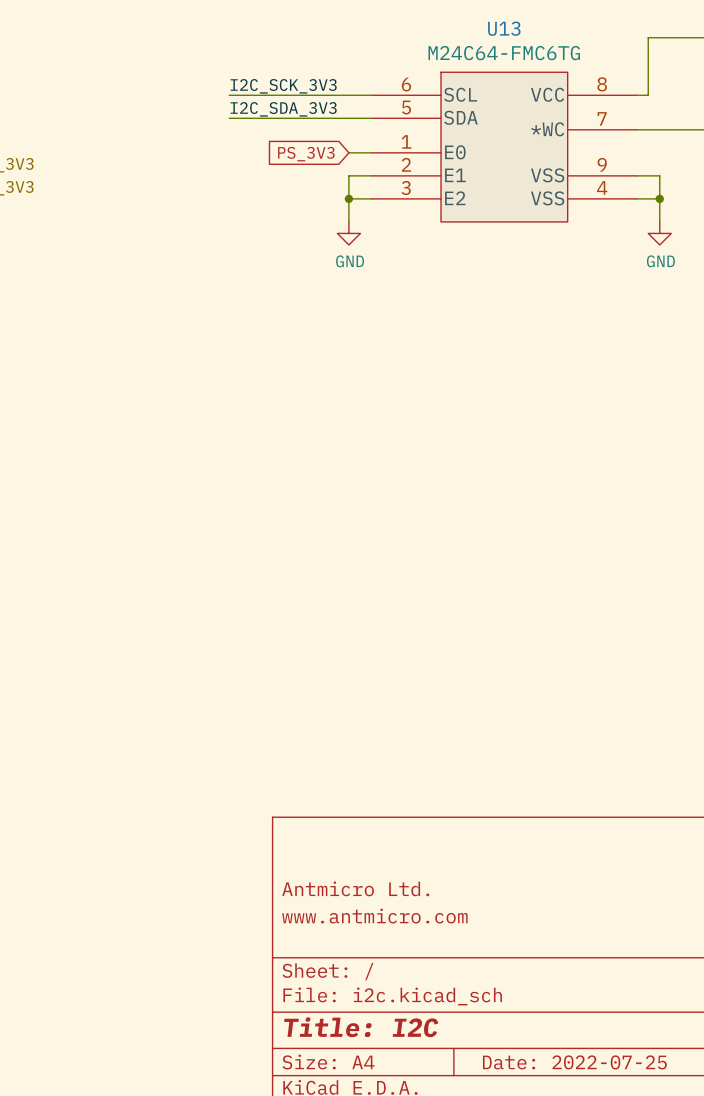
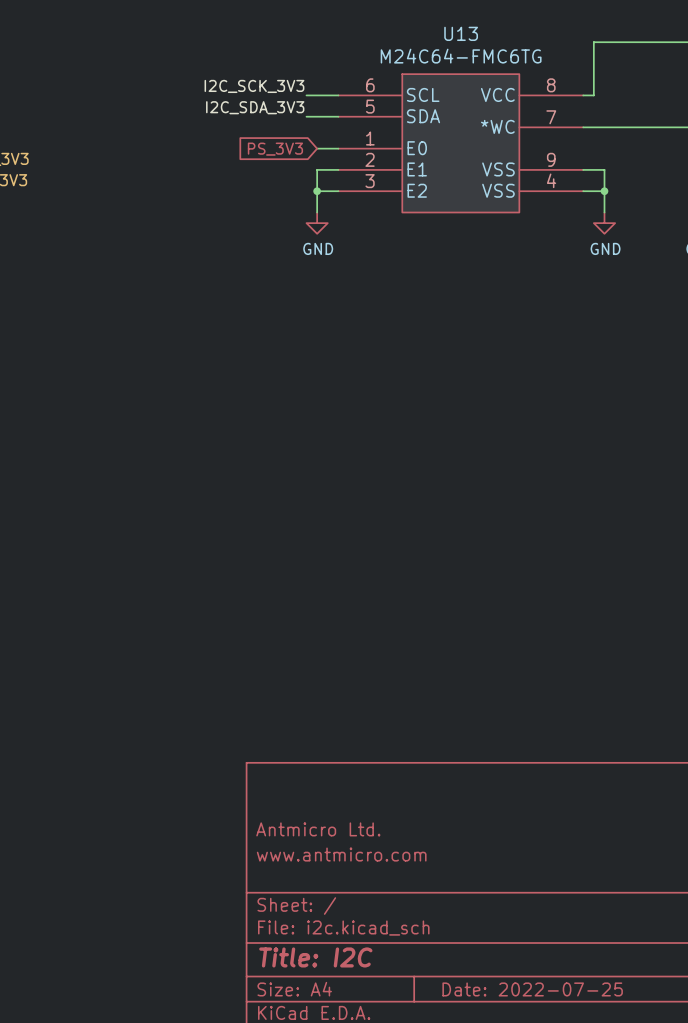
label position: I2C_SCK_3V3 (283, 86) -> I2C_SCK_3V3 (254, 86)
wire: (229, 95) (337, 95) -> none
label position: I2C_SDA_3V3 (283, 109) -> I2C_SDA_3V3 (255, 107)
wire: (229, 118) (337, 118) -> none

